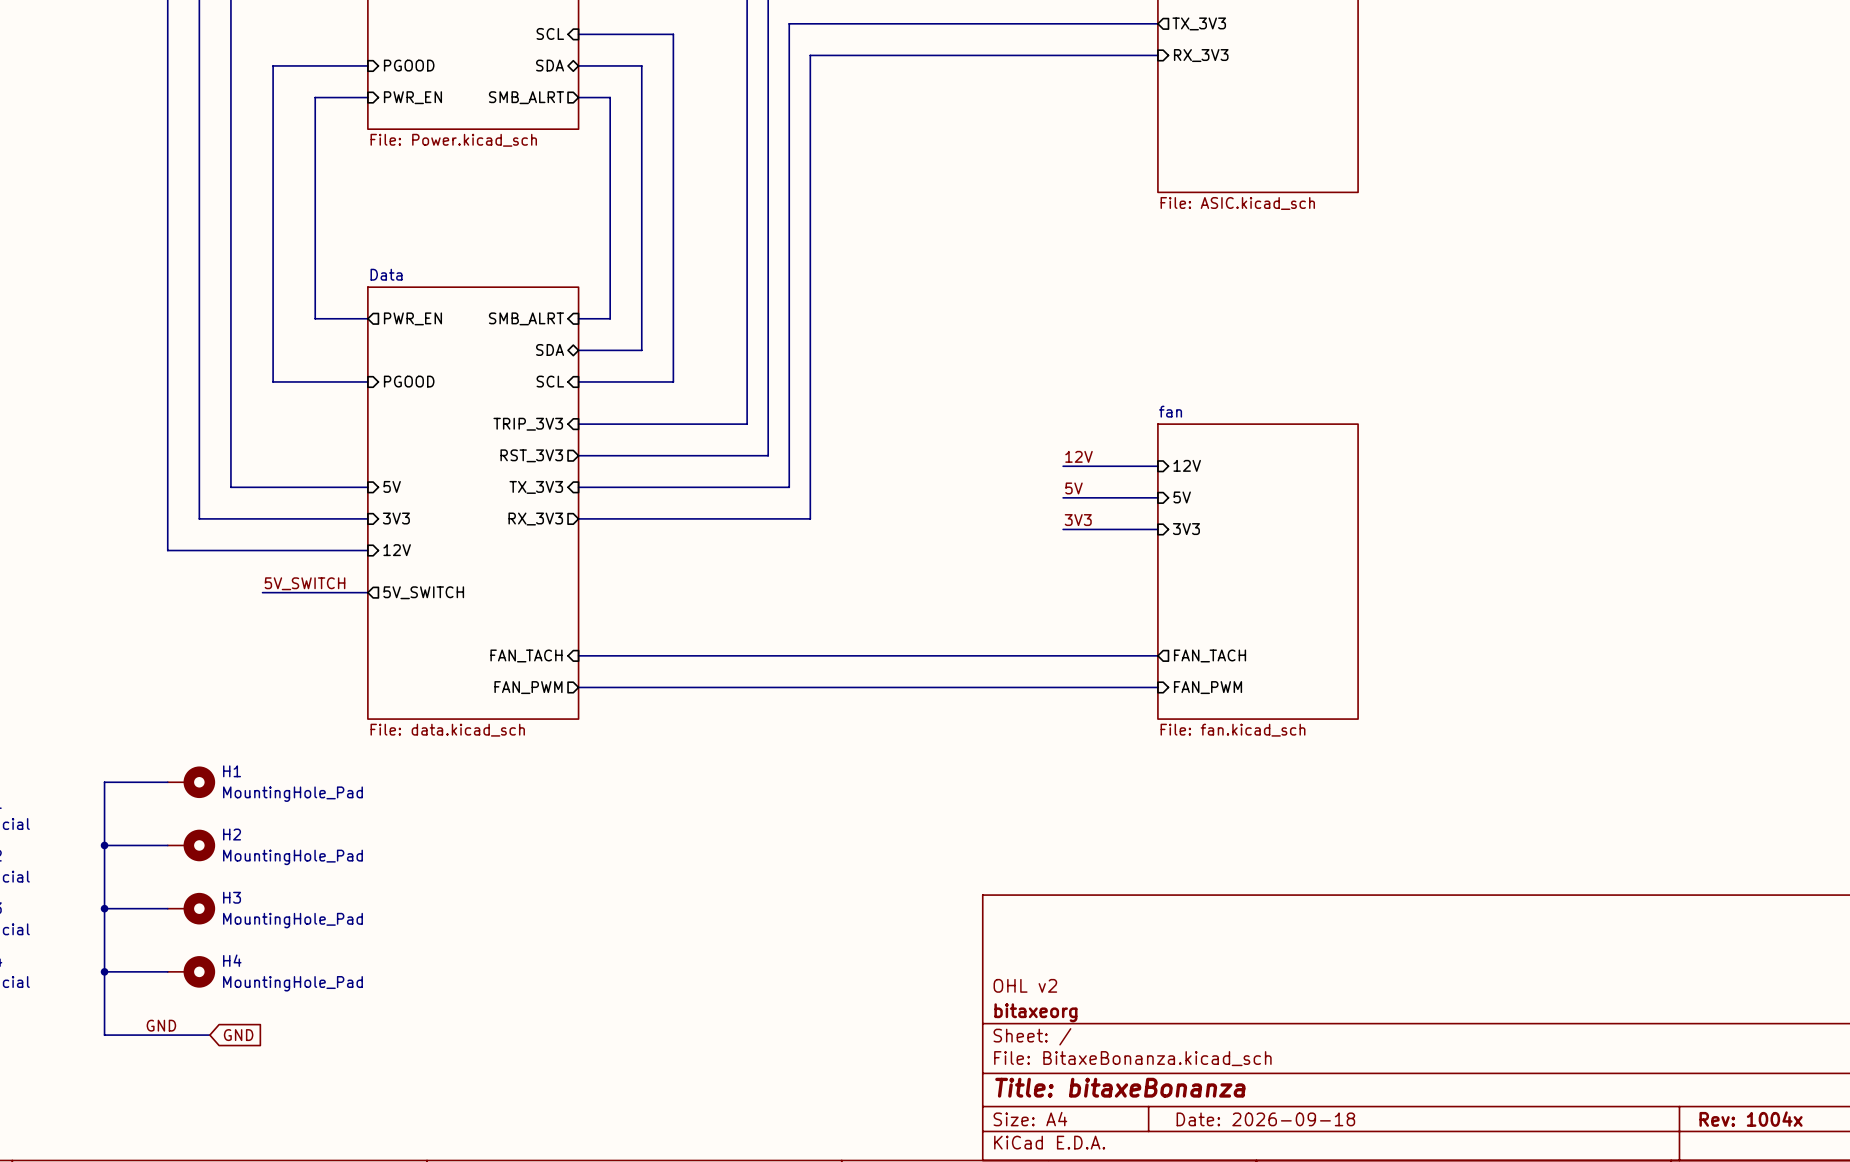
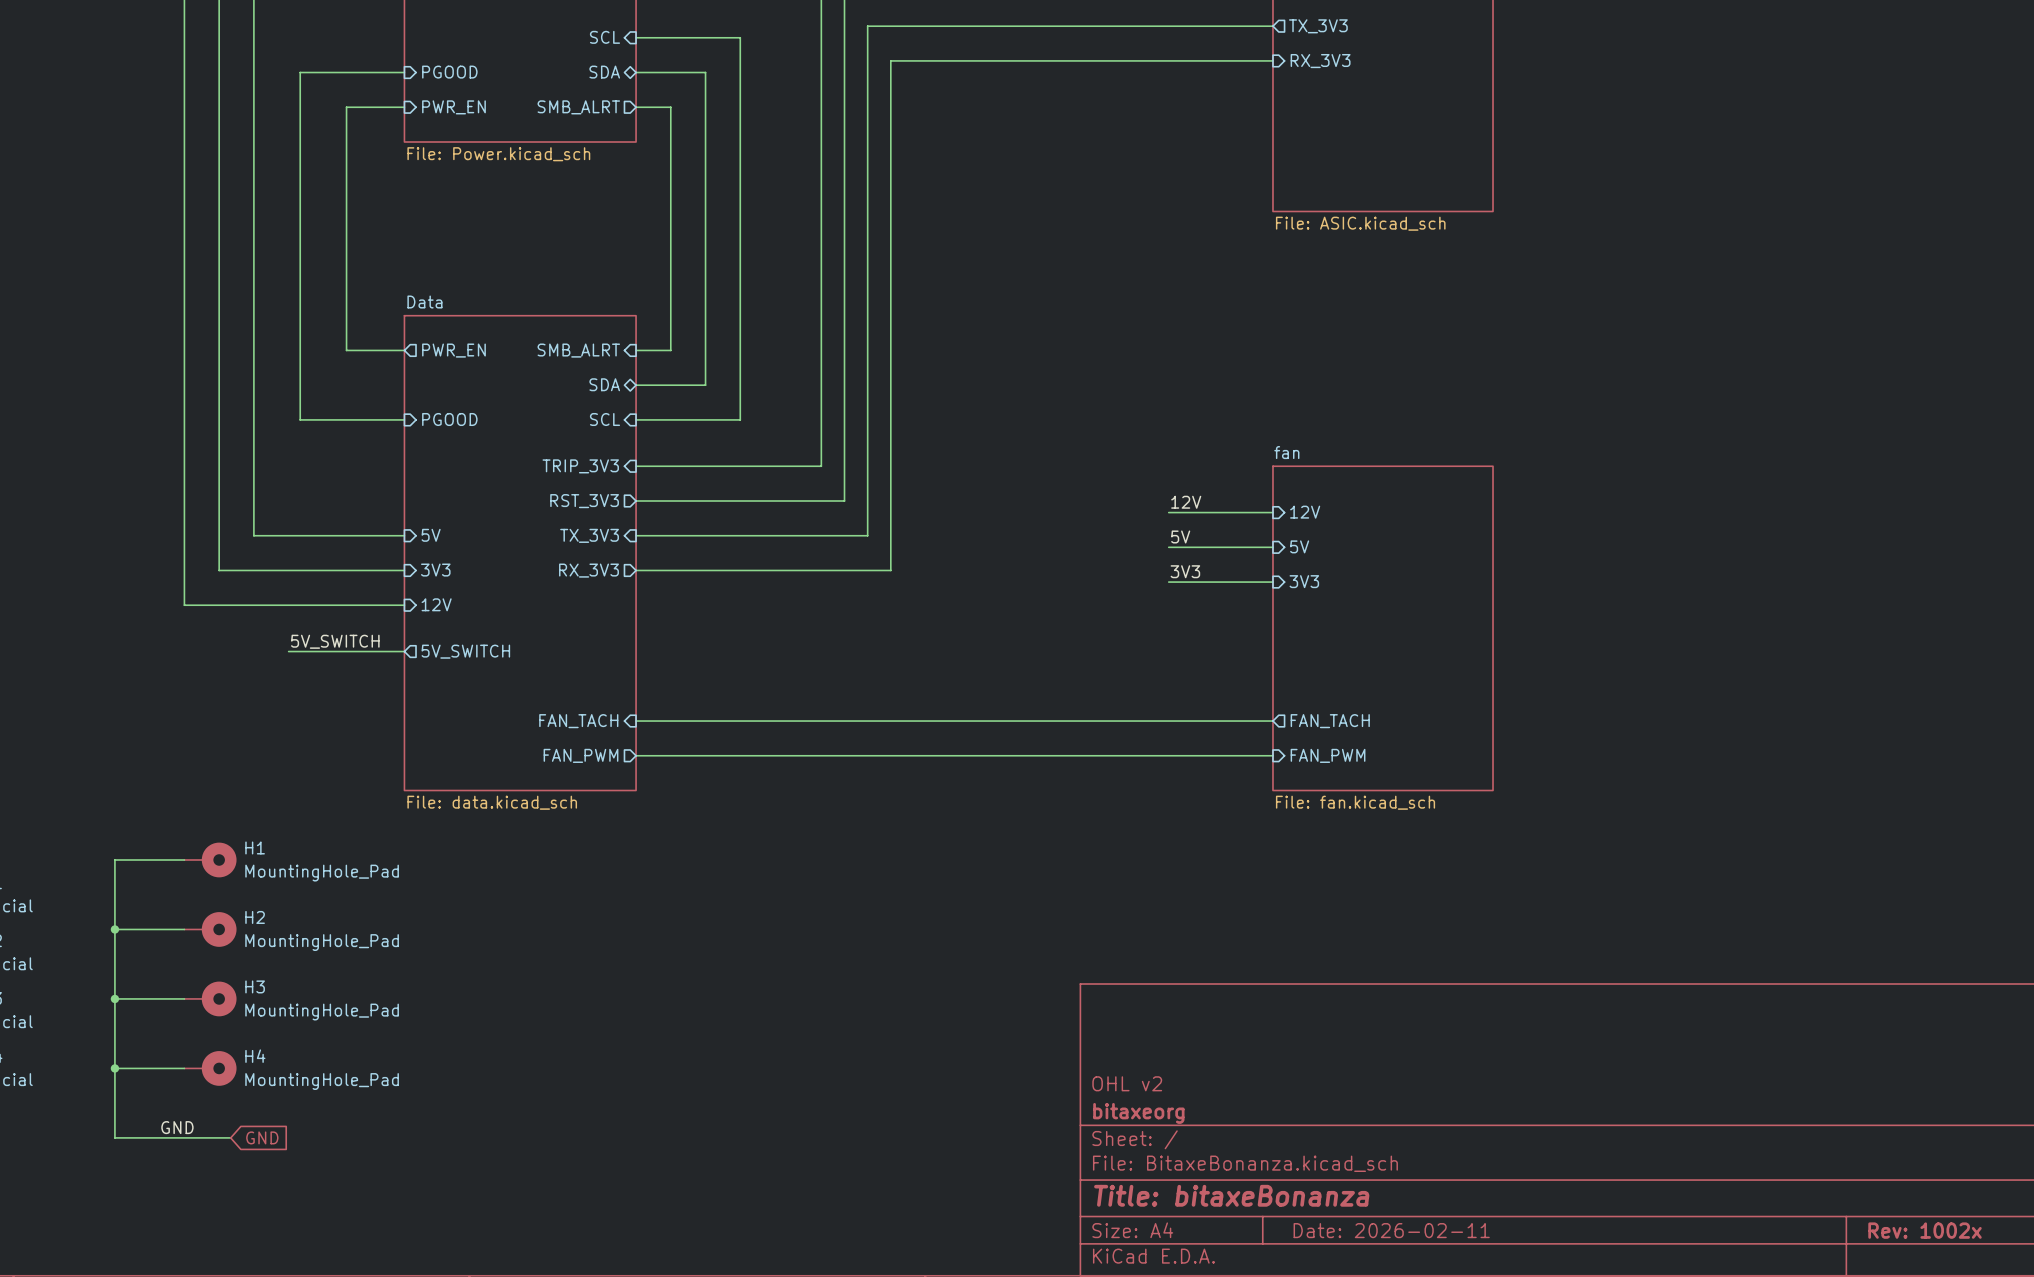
title block: Date: 2026-09-18 (1265, 1119) -> Date: 2026-02-11 (1391, 1230)
title block: Rev: 1004x (1751, 1119) -> Rev: 1002x (1925, 1230)

